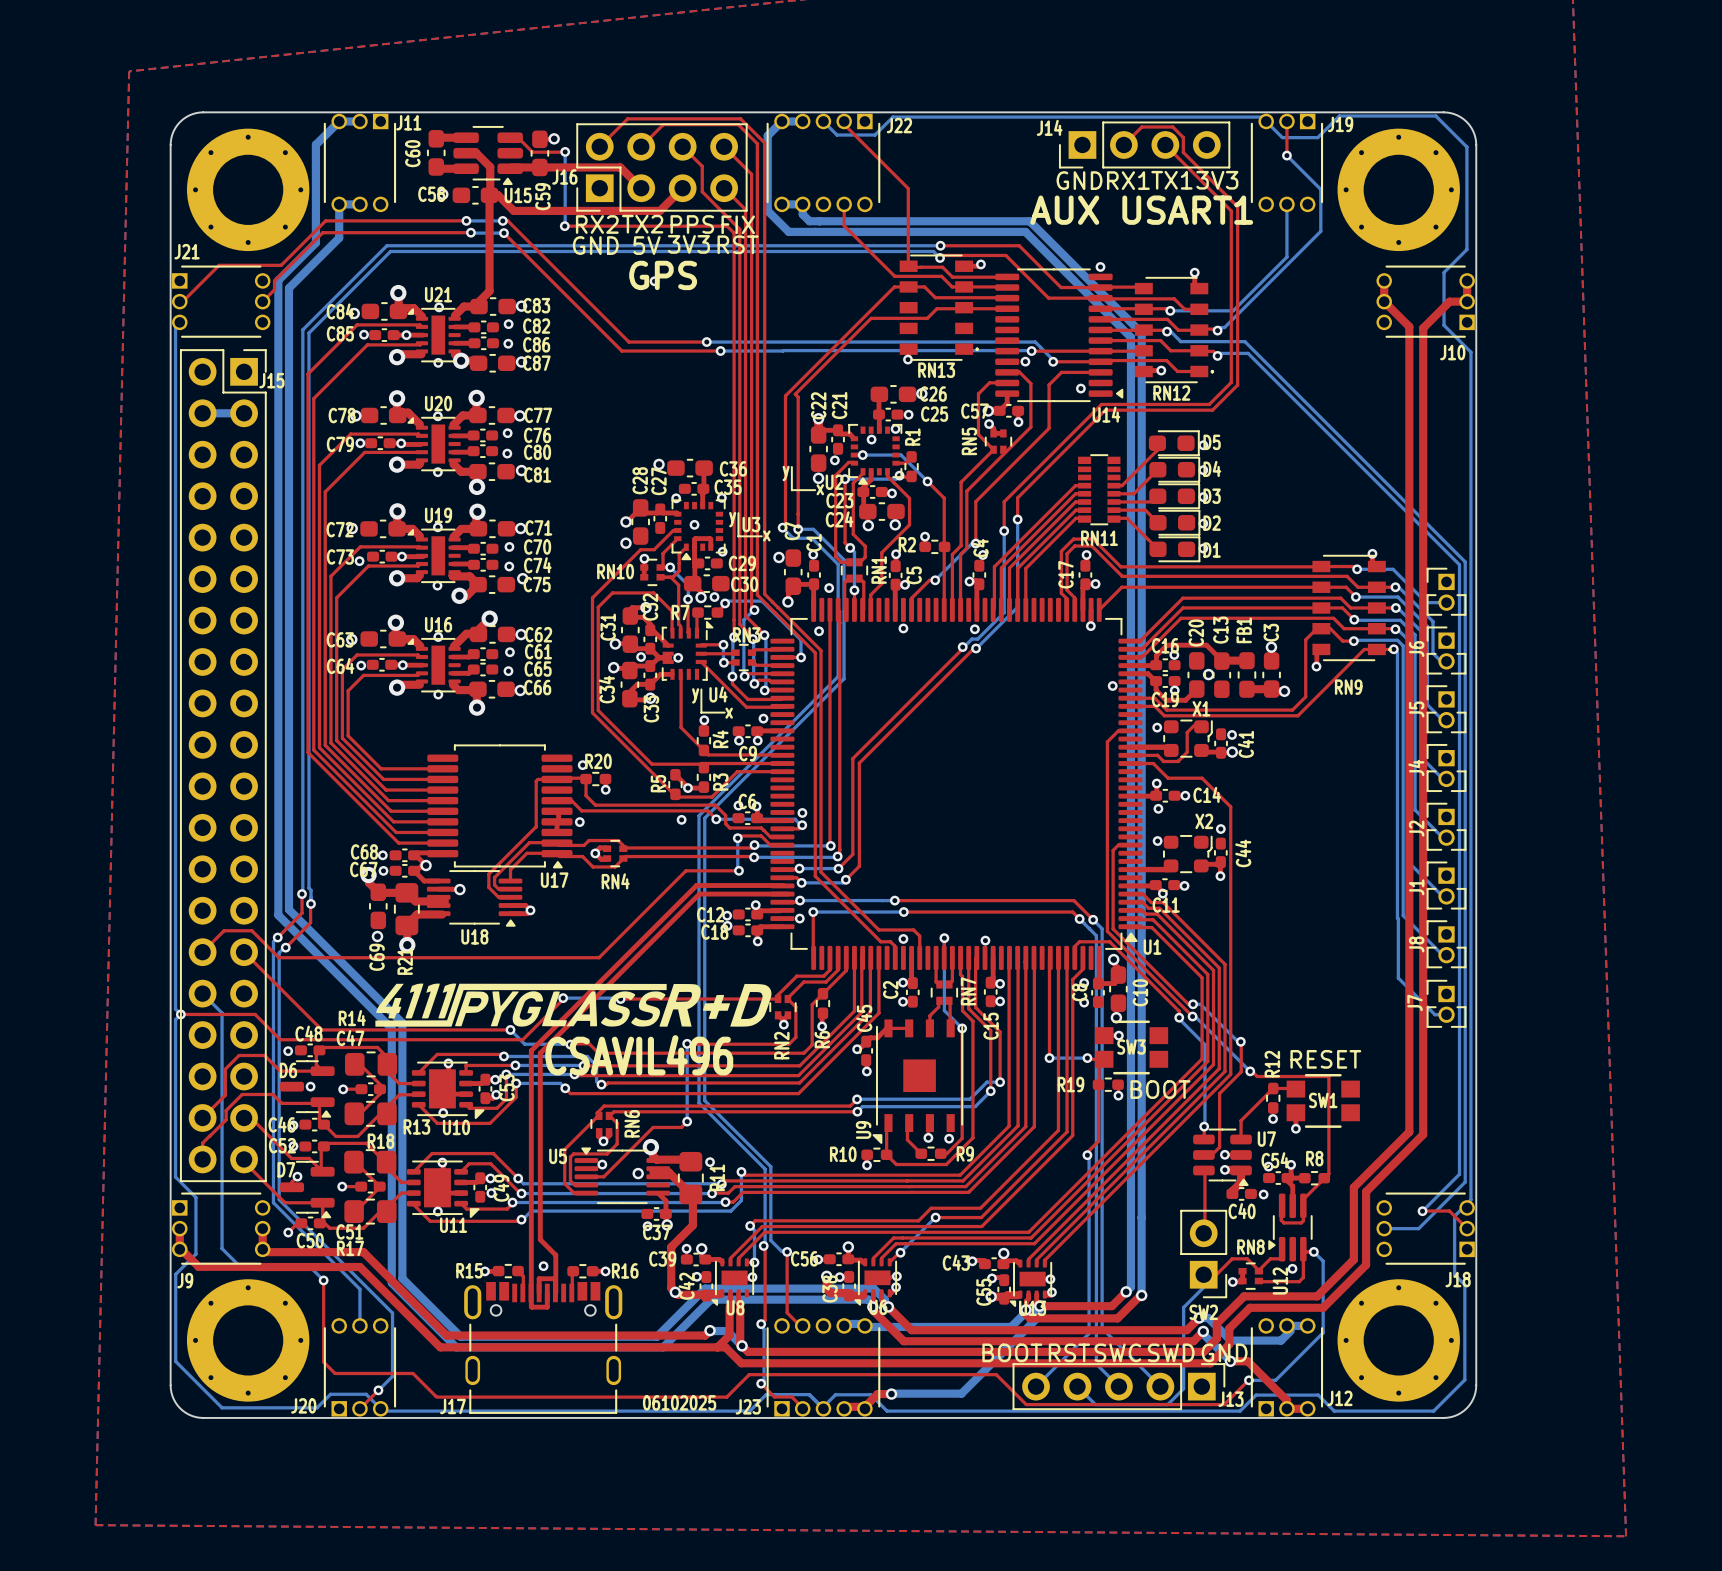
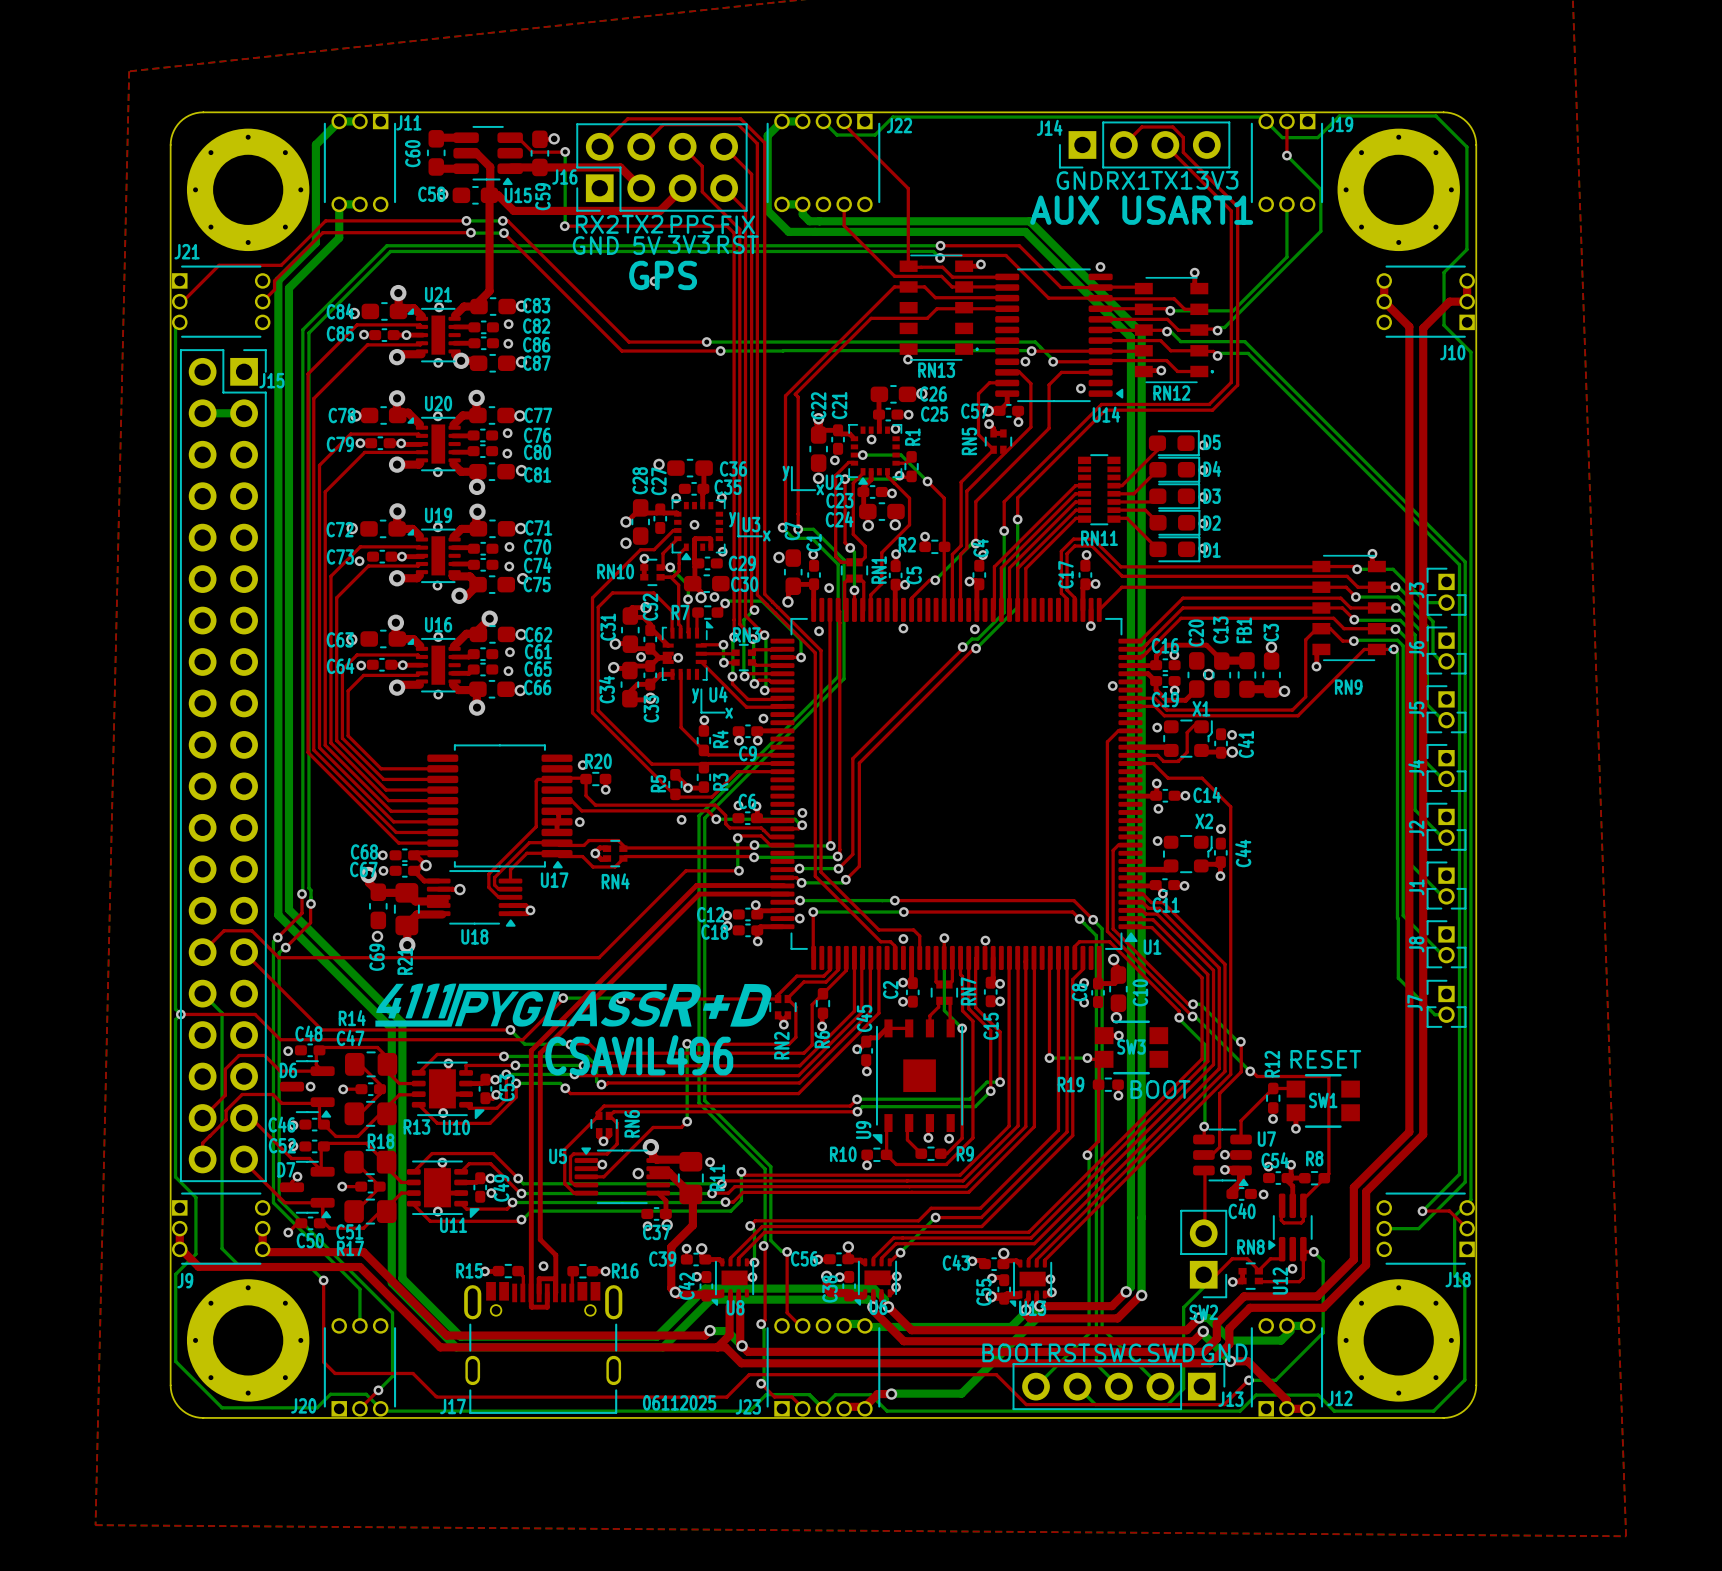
J3 name: none -> J3 (1416, 590)
text: 06102025 (679, 1402) -> 06112025 (679, 1402)

